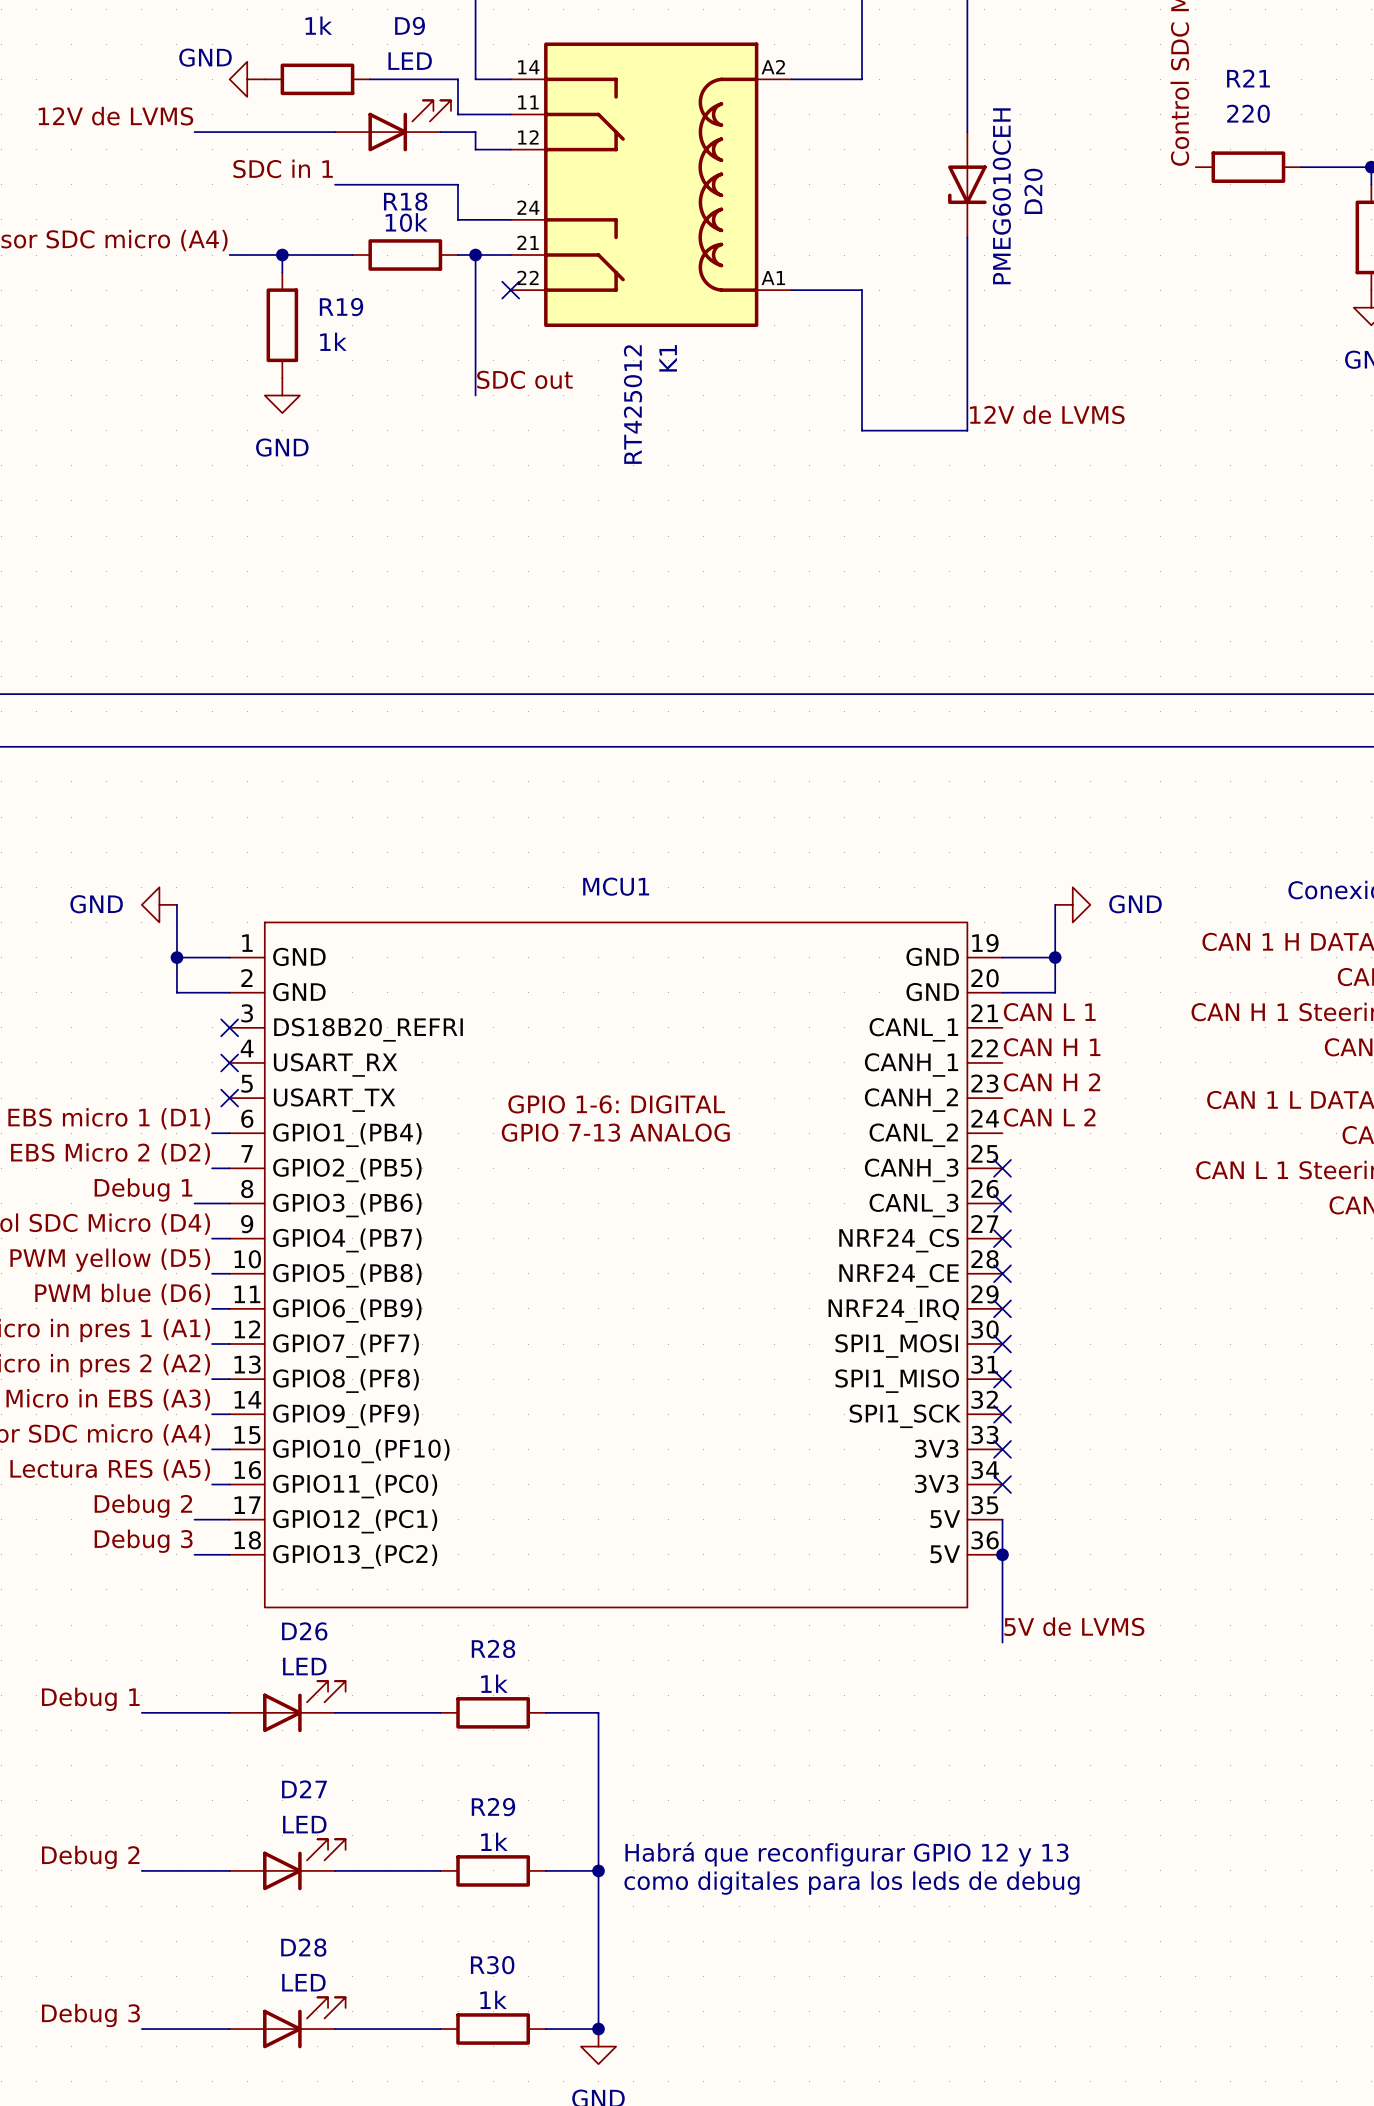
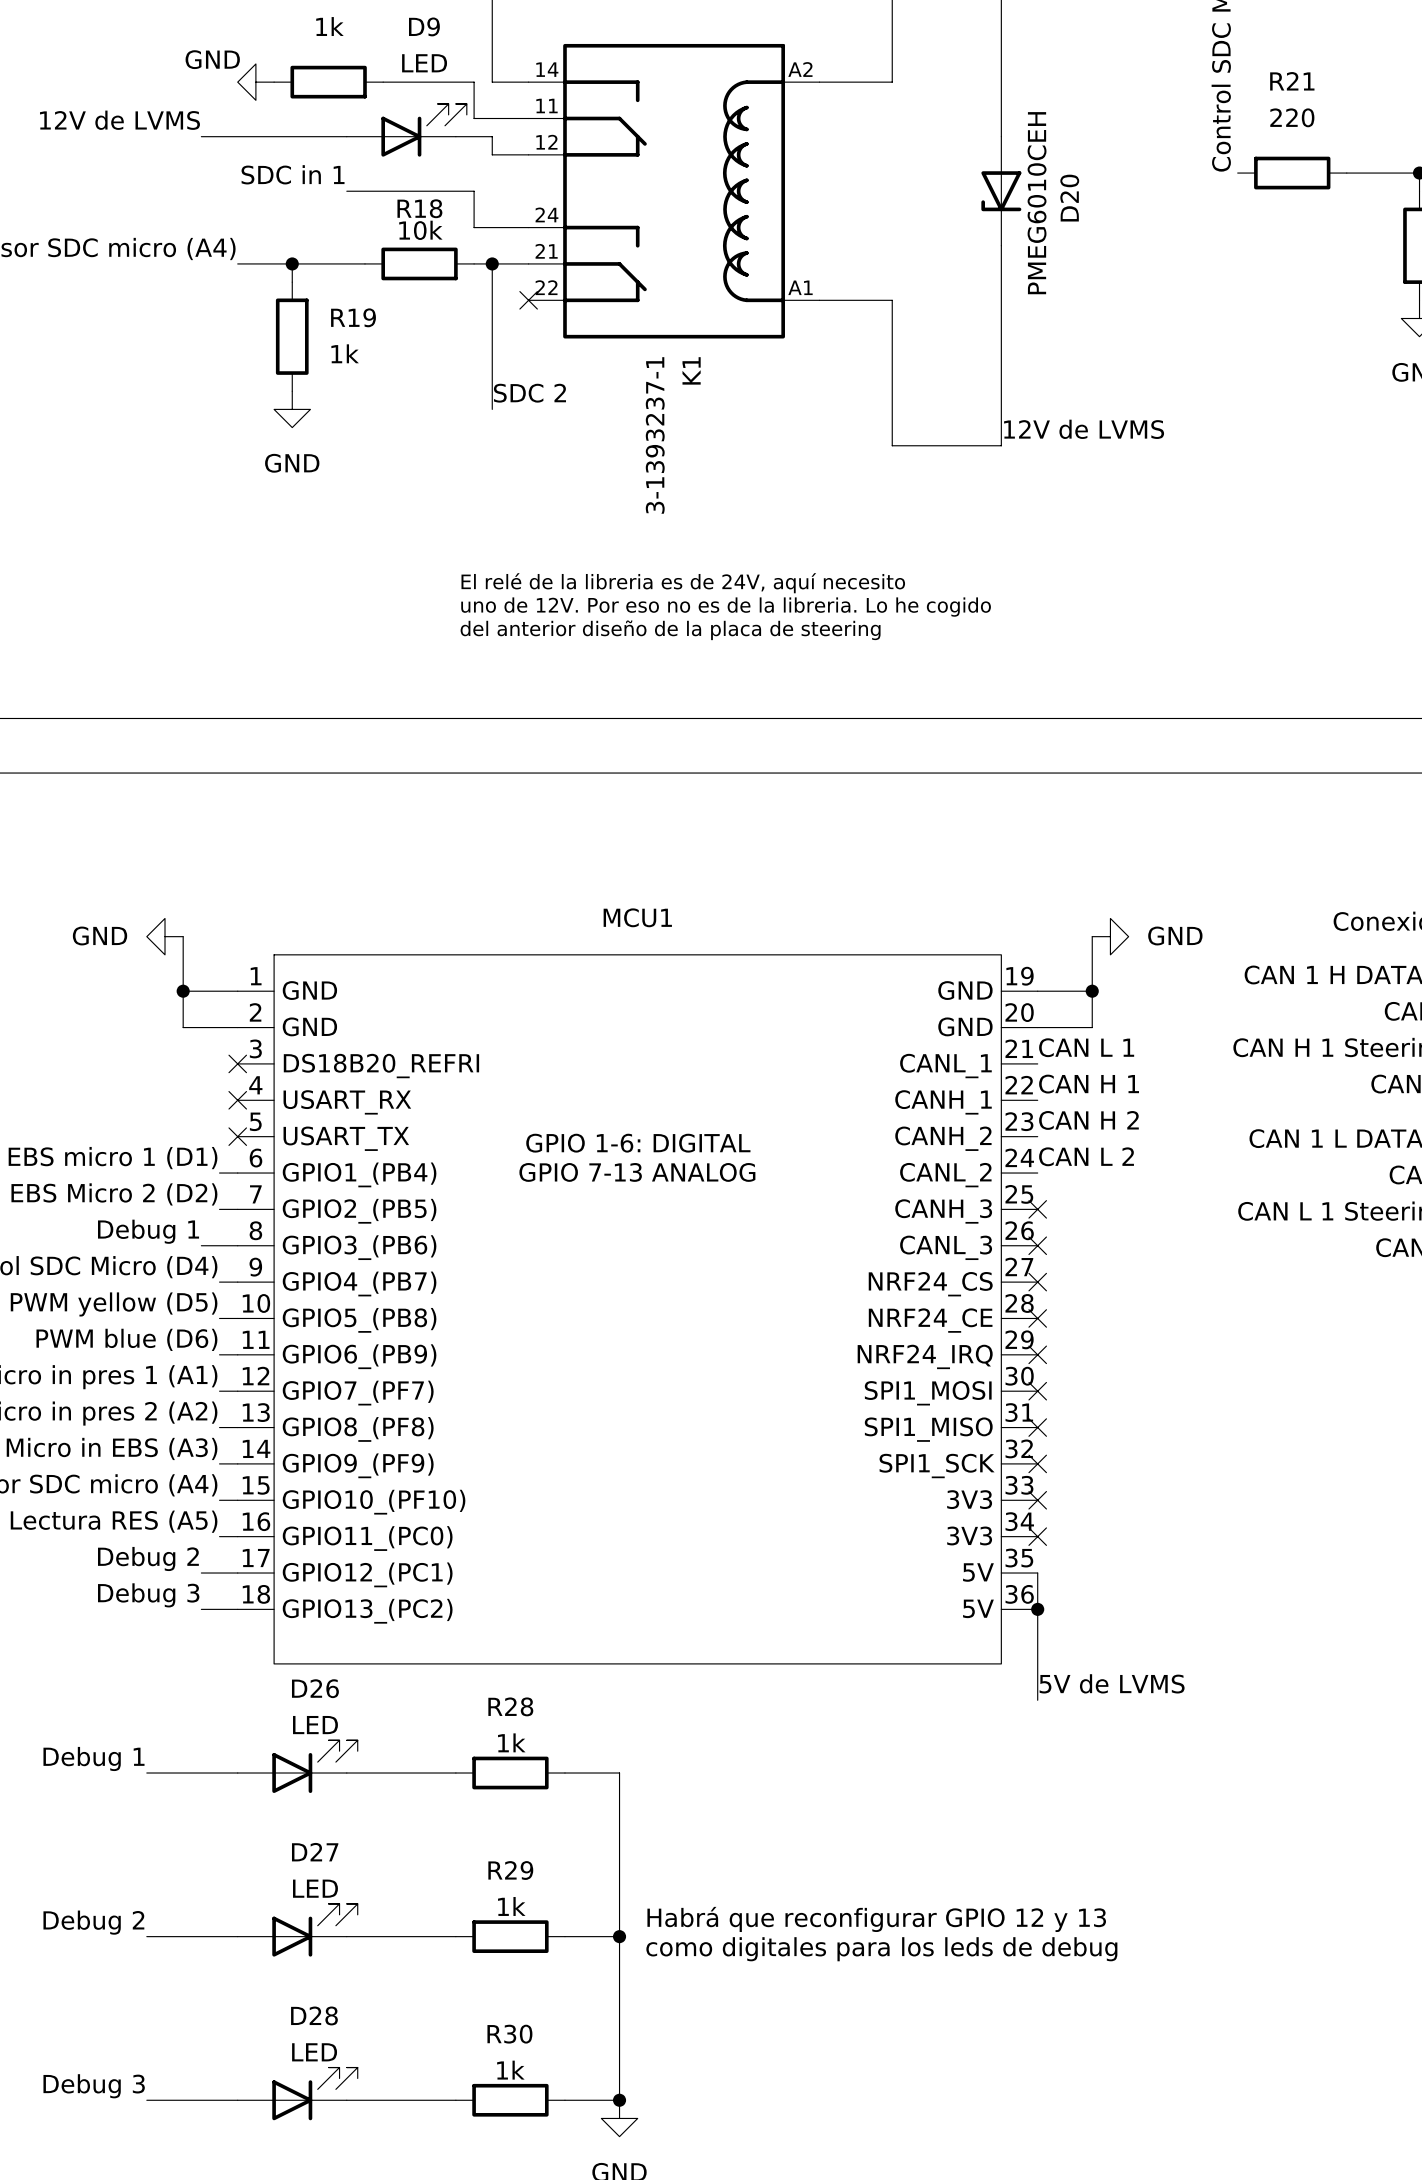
label: SDC out (524, 379) -> SDC 2 (529, 393)
K1 value: RT425012 (633, 404) -> 3-1393237-1 (655, 435)
text: none -> El relé de la libreria es de 24V, aquí necesito (683, 583)
text: none -> uno de 12V. Por eso no es de la libreria. Lo he cogido (726, 607)
text: none -> del anterior diseño de la placa de steering (670, 630)

